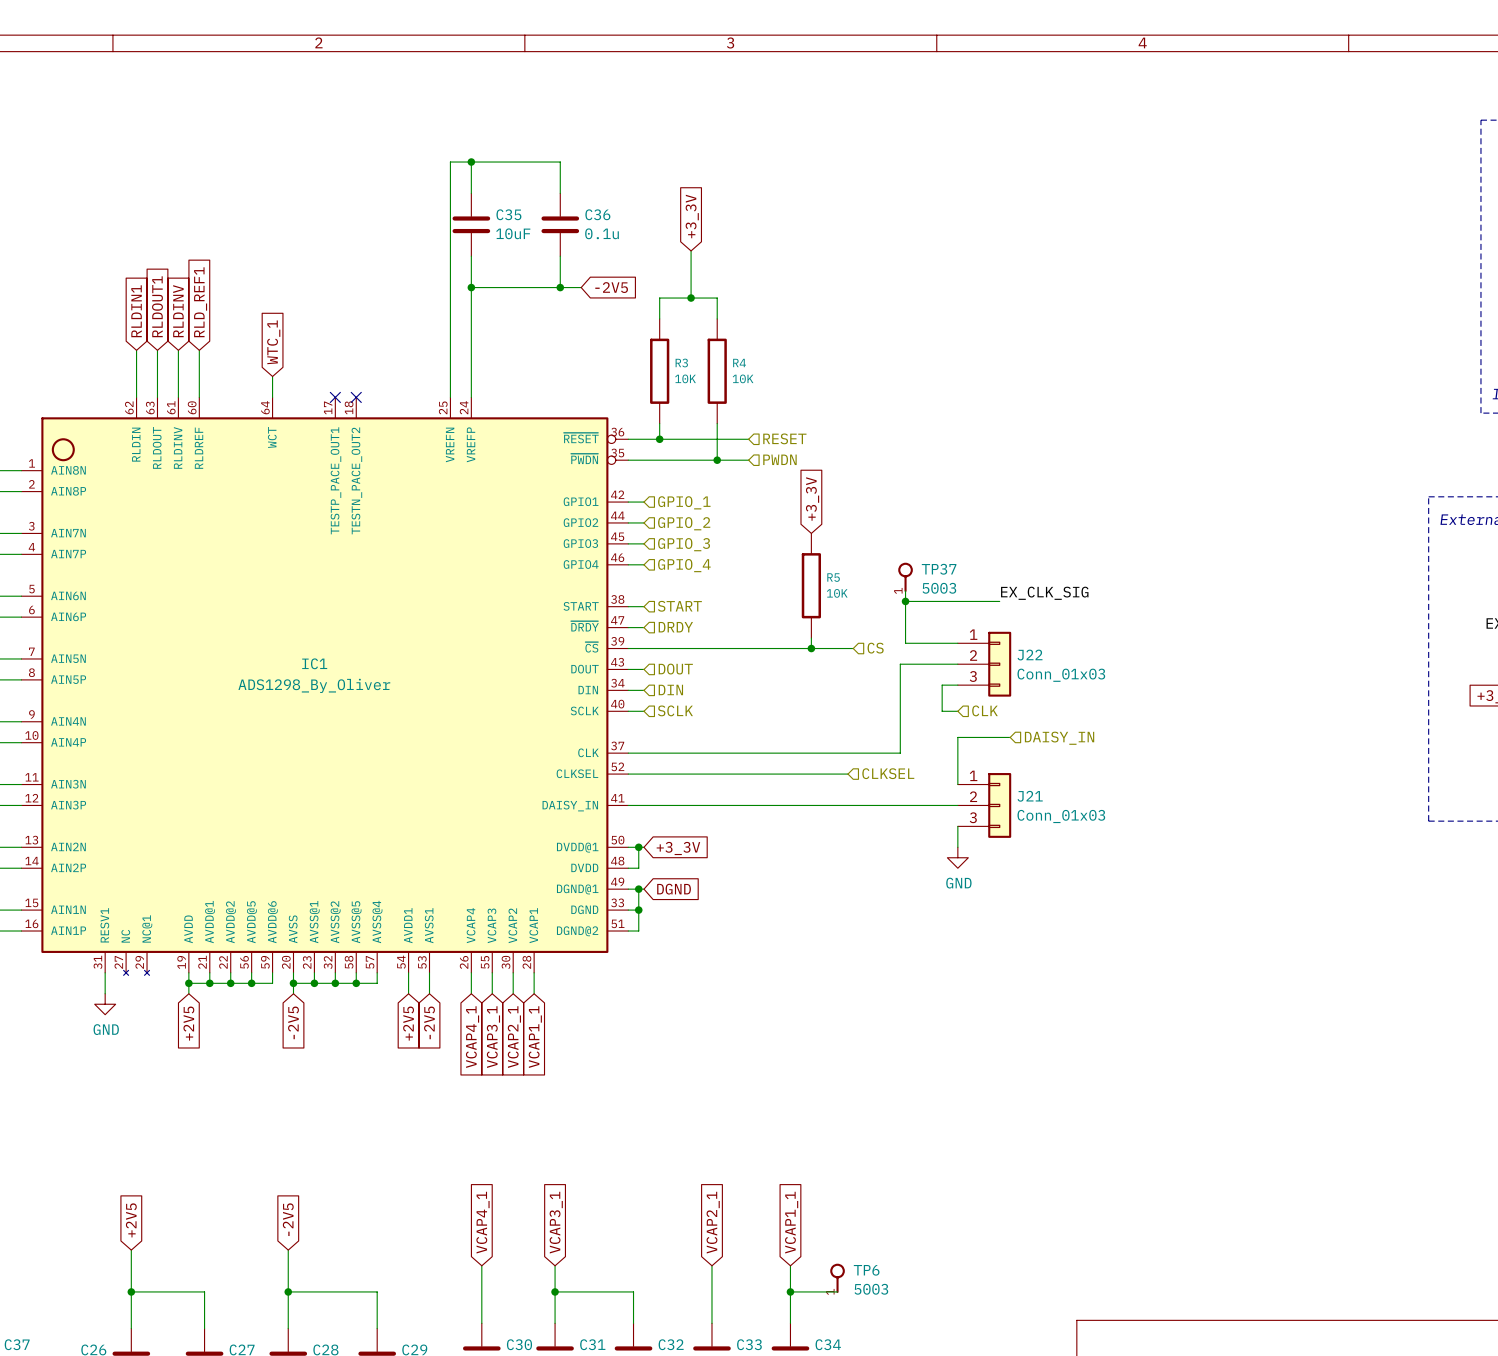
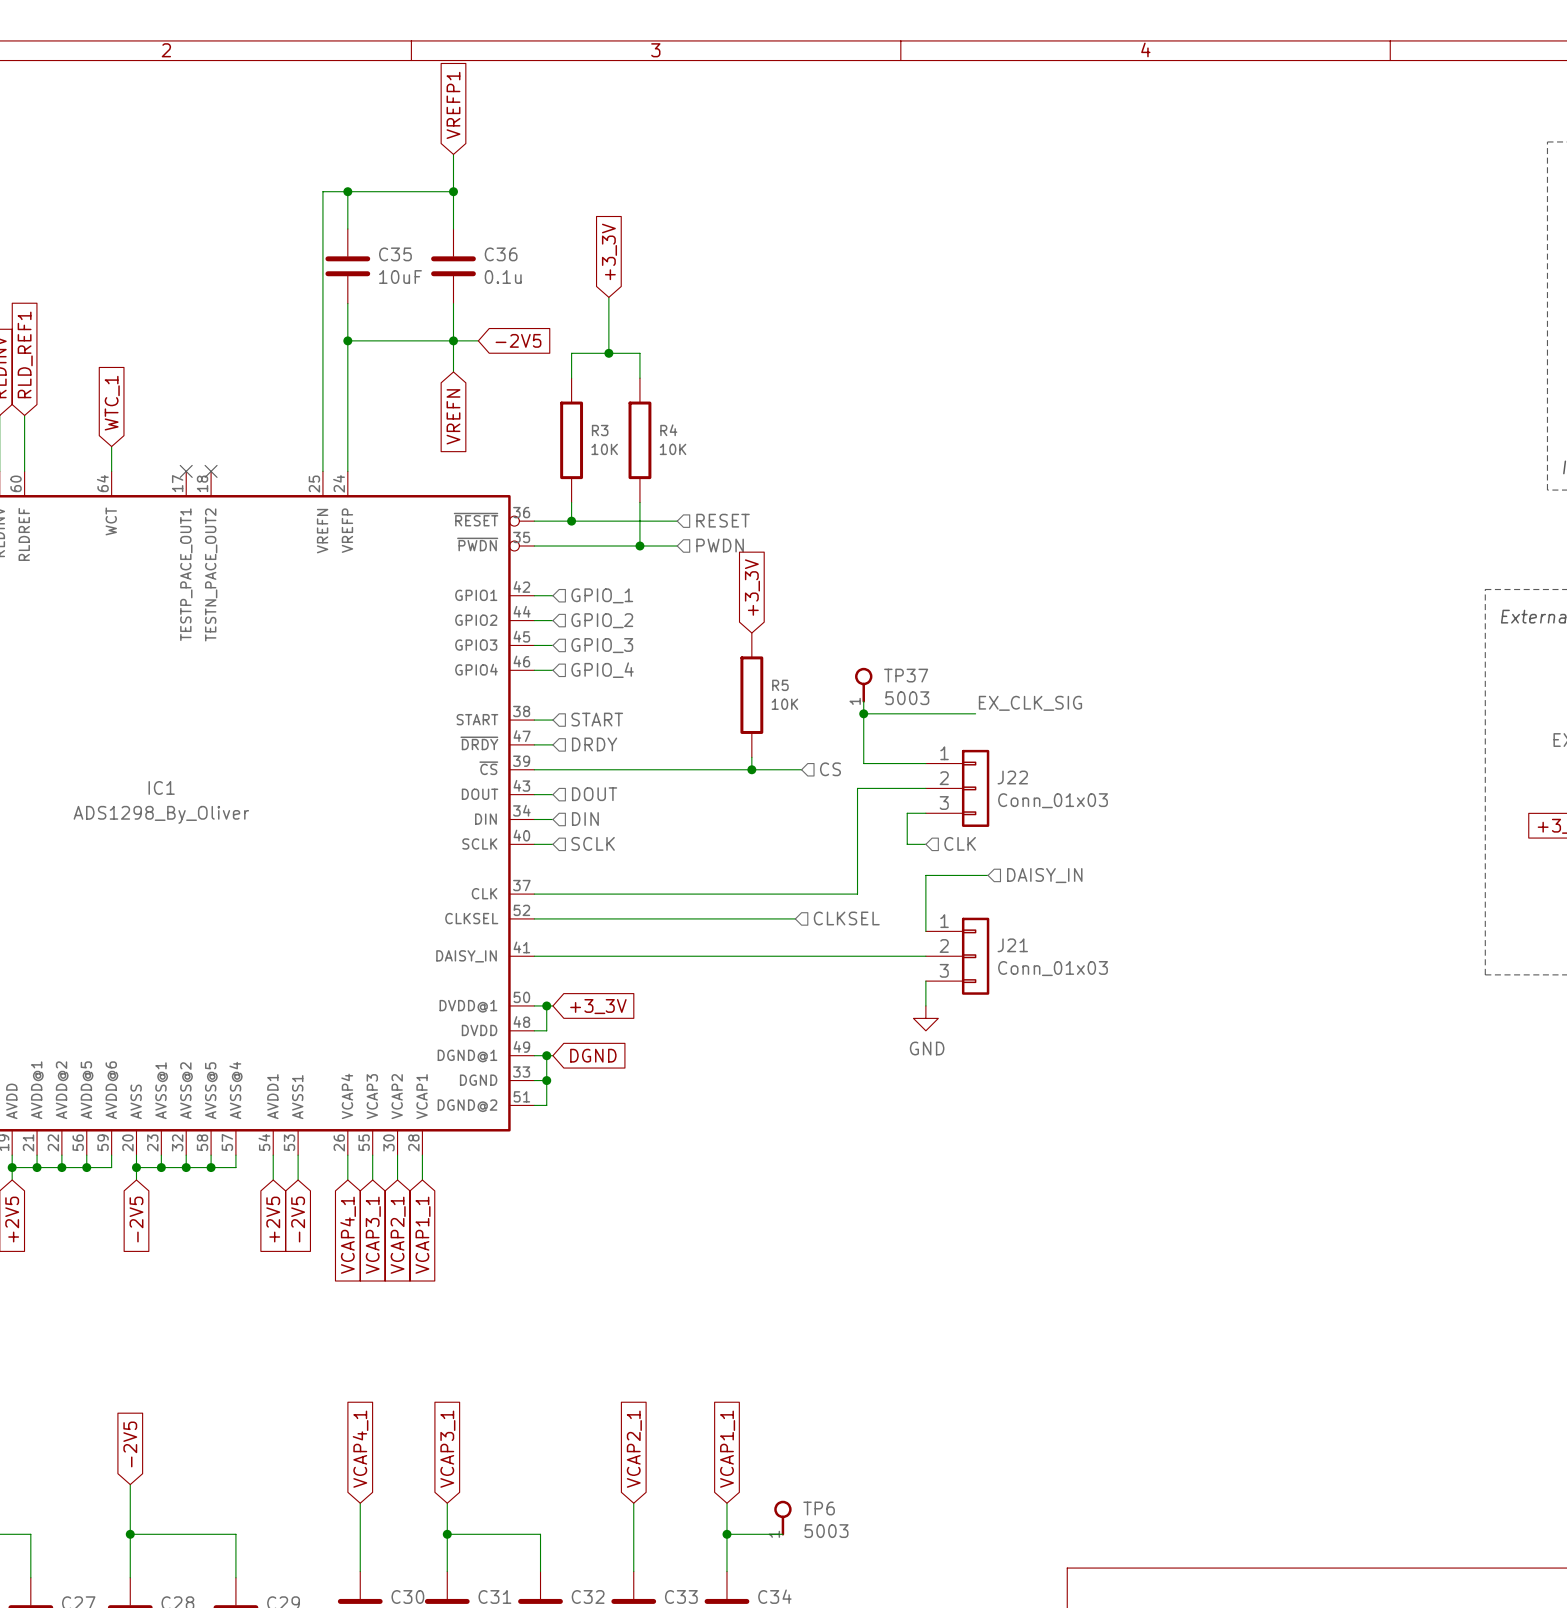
global label: none -> VREFP1 (453, 105)
wire: none -> (453, 154) (453, 191)
junction: none -> (453, 191)
wire: none -> (453, 340) (453, 371)
global label: none -> VREFN (453, 416)

